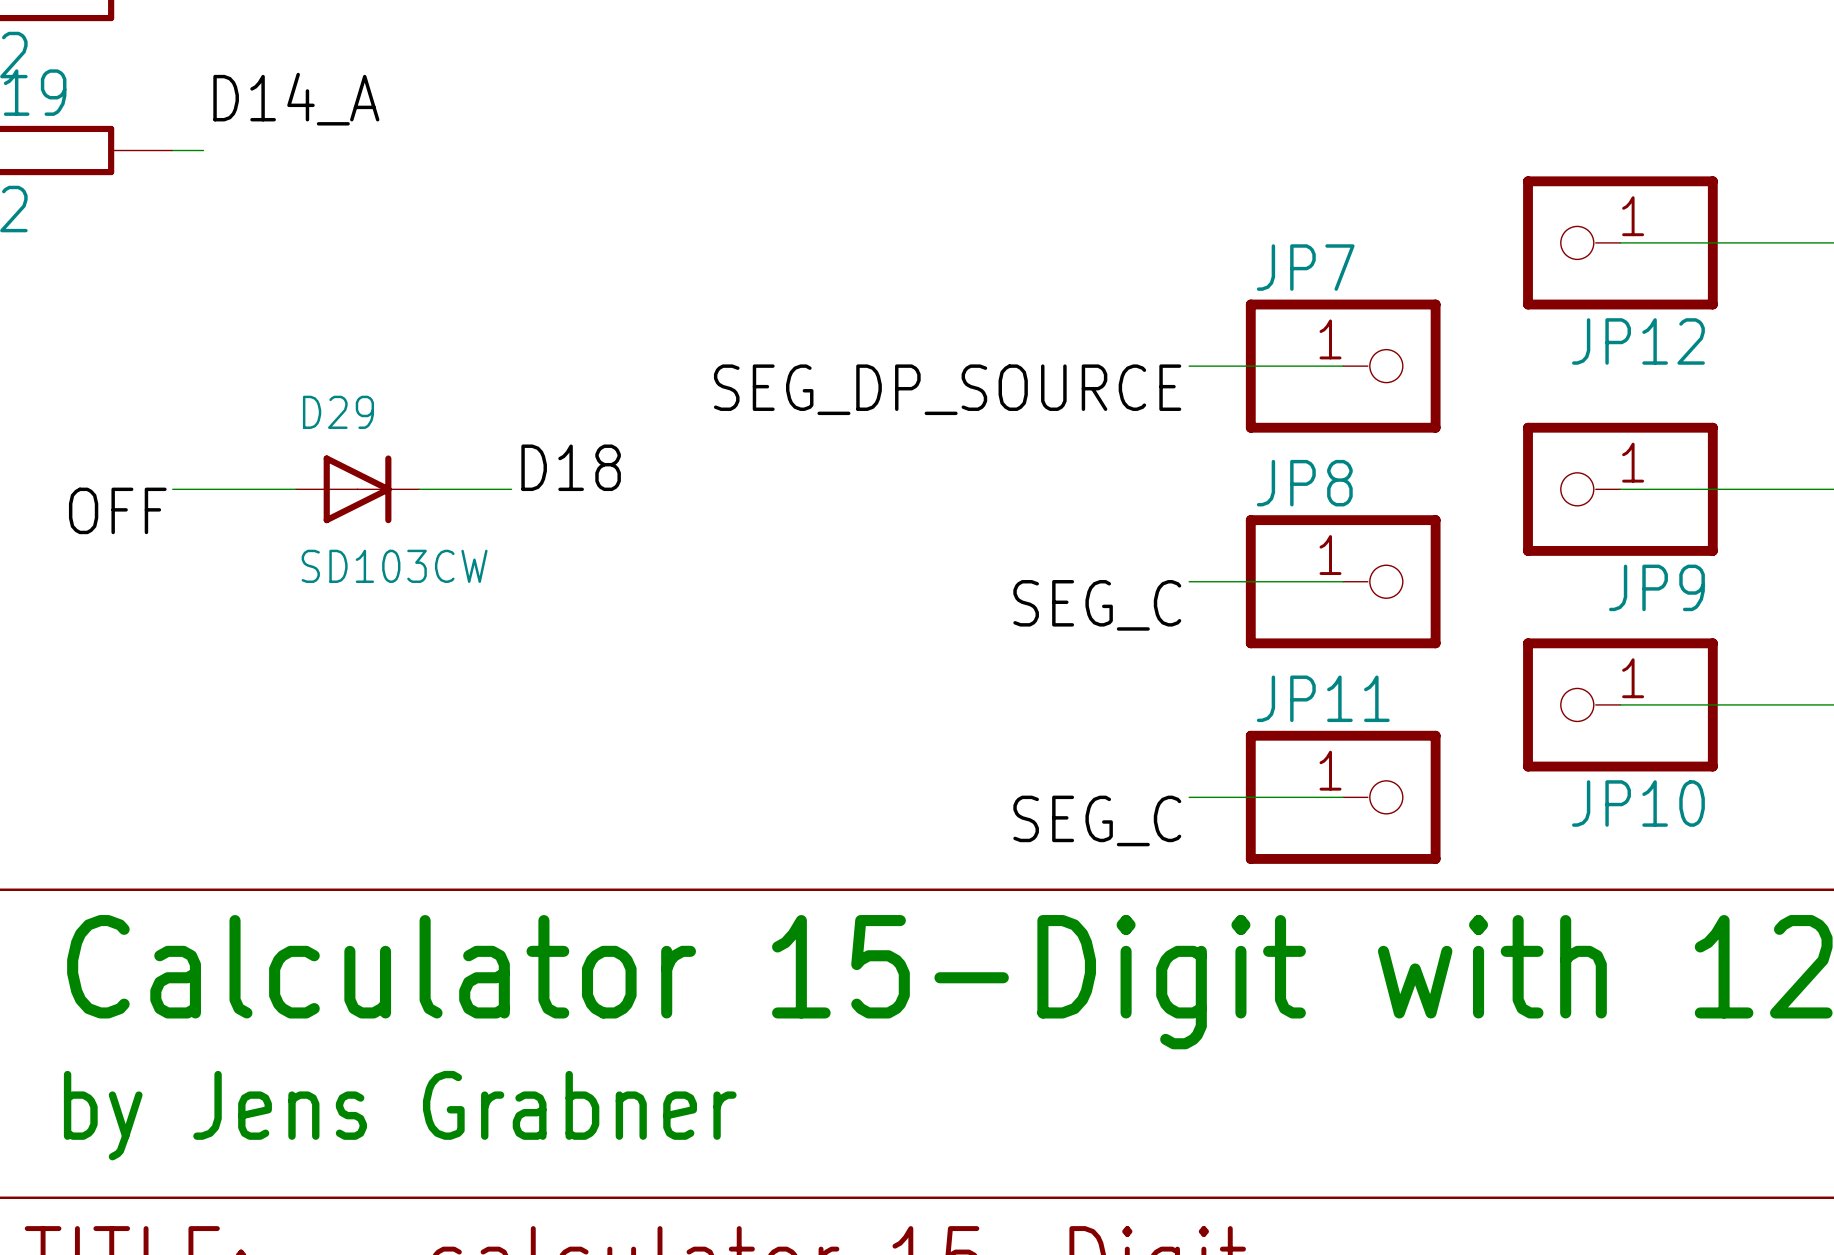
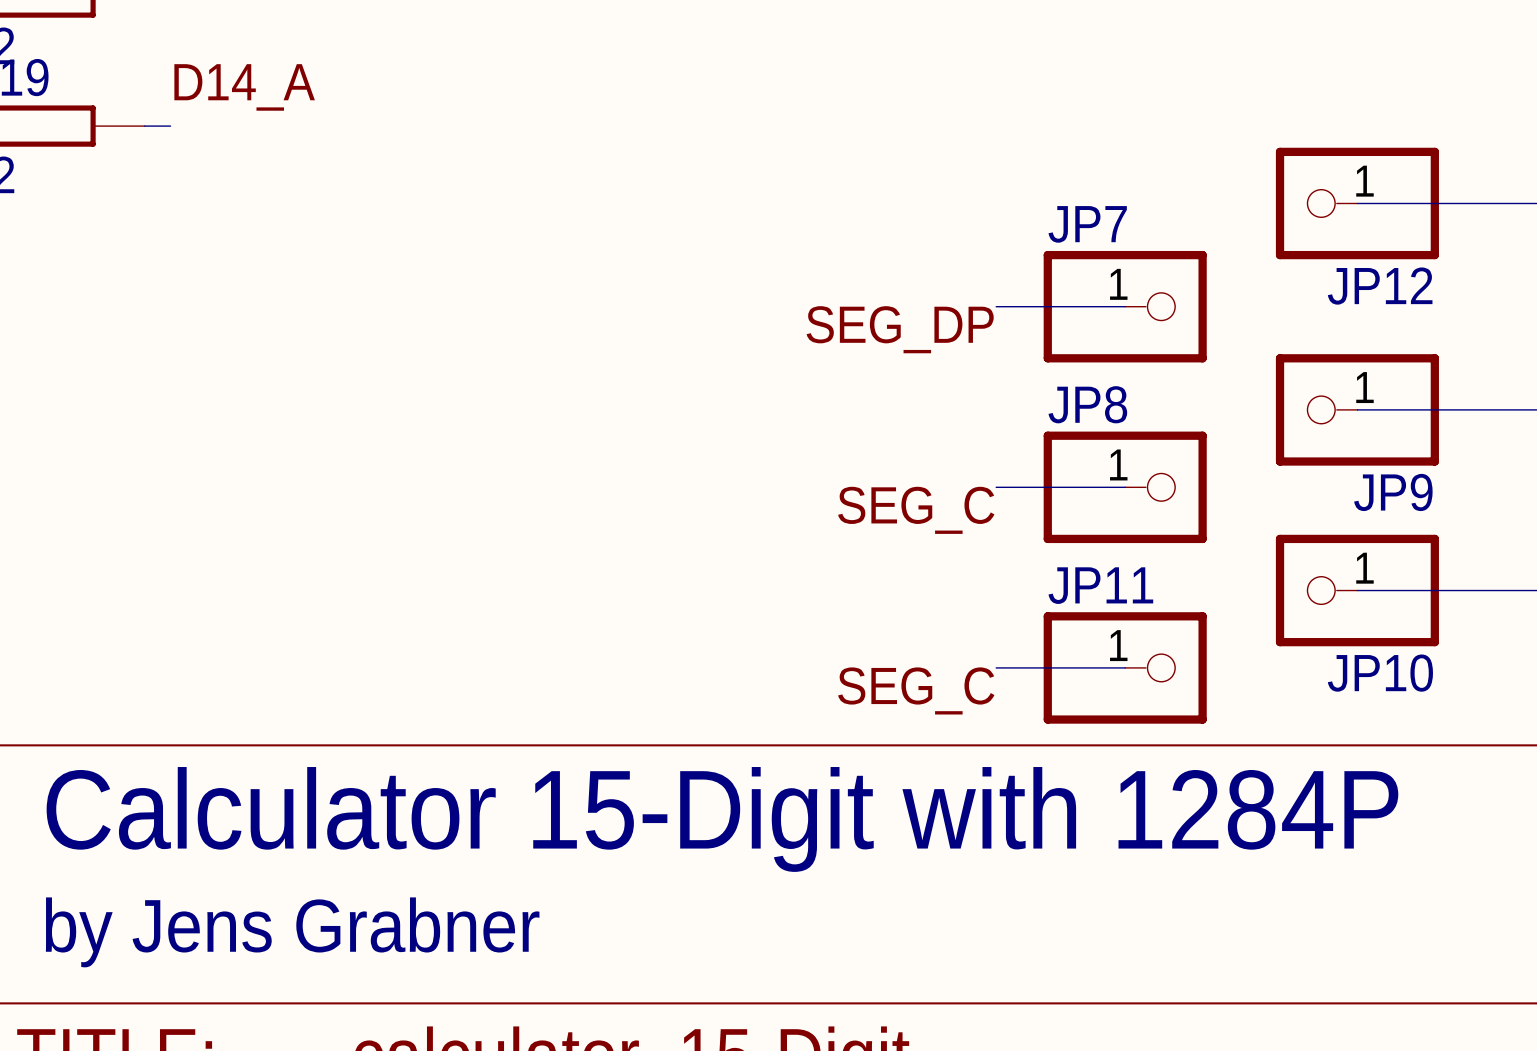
label: SEG_DP_SOURCE (947, 389) -> SEG_DP (900, 329)
label: D18 (571, 467) -> none
wire: (172, 489) (295, 489) -> none
D29: SD103CW (357, 489) -> none
wire: (419, 489) (511, 489) -> none
label: OFF (117, 510) -> none

